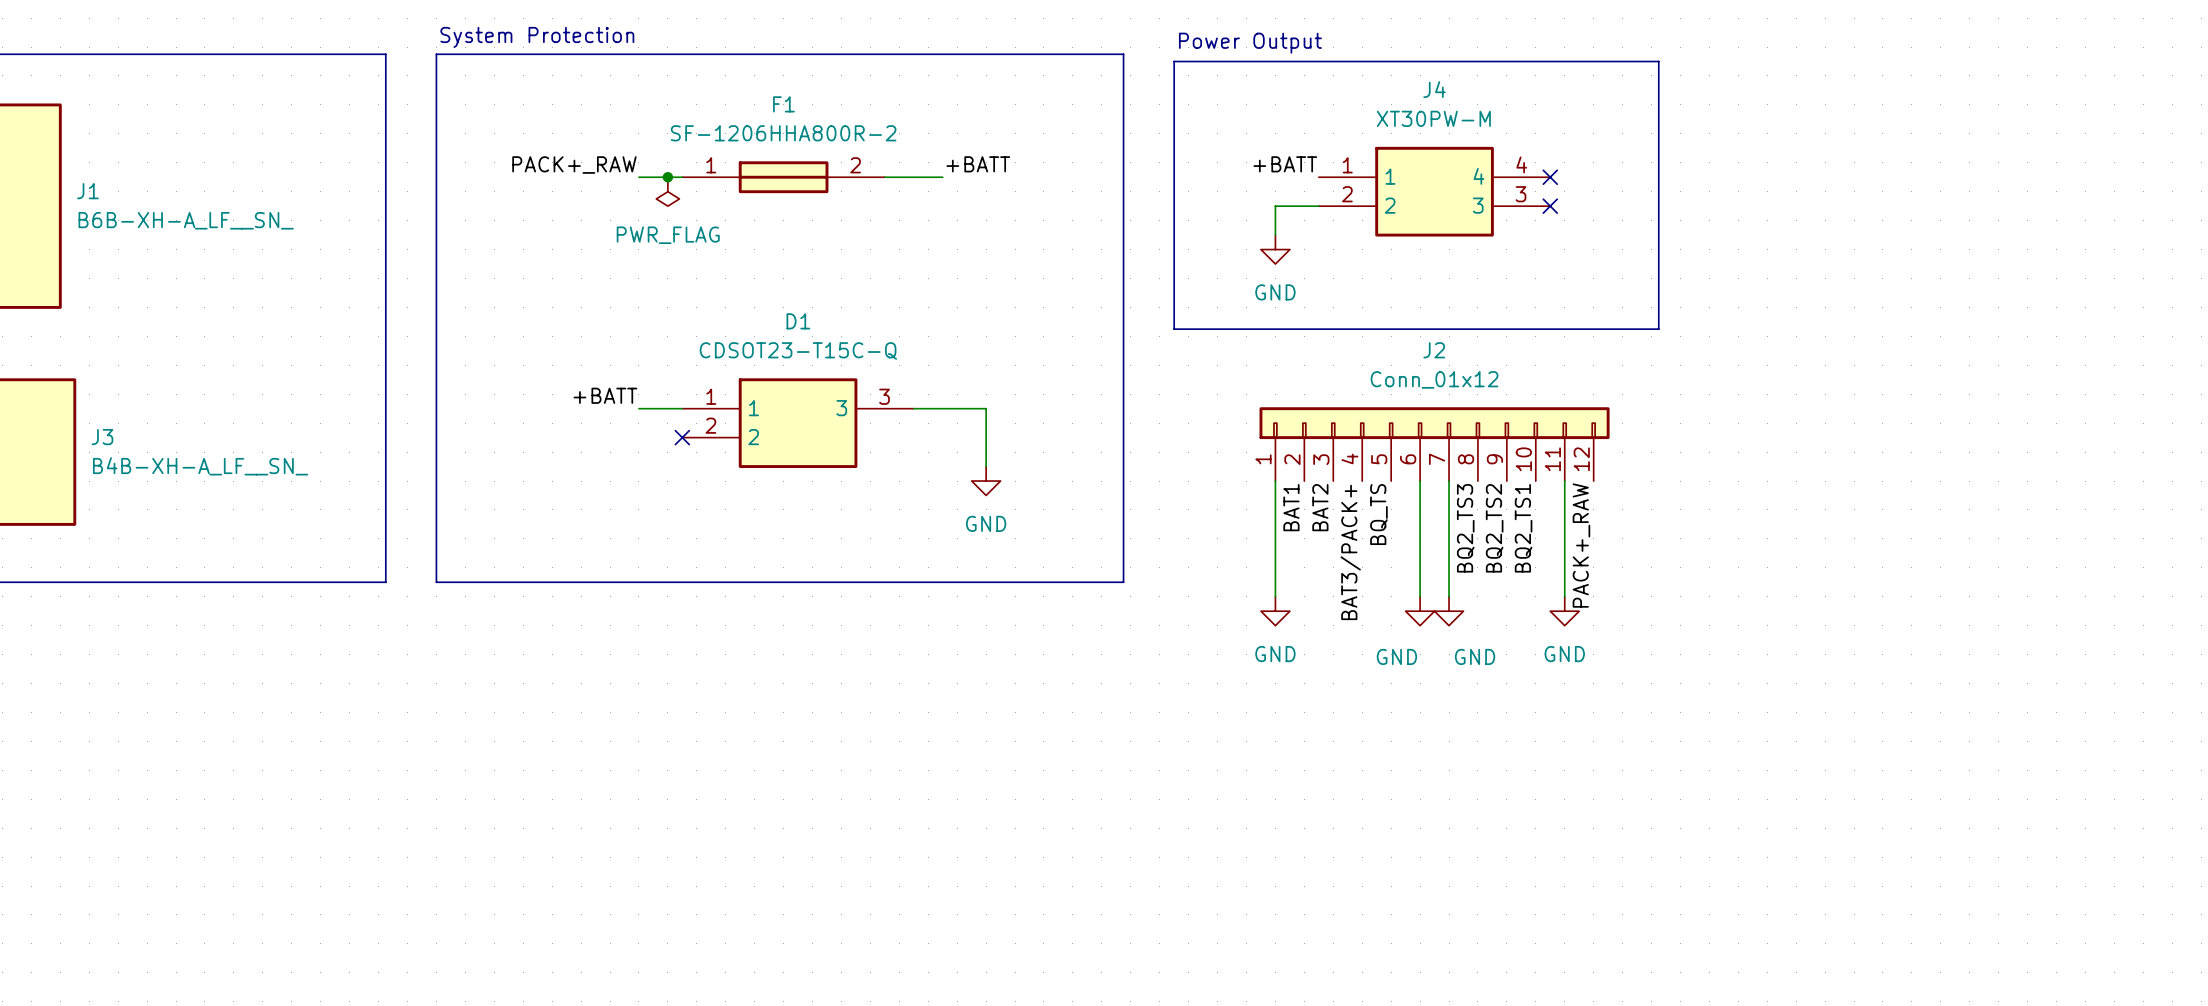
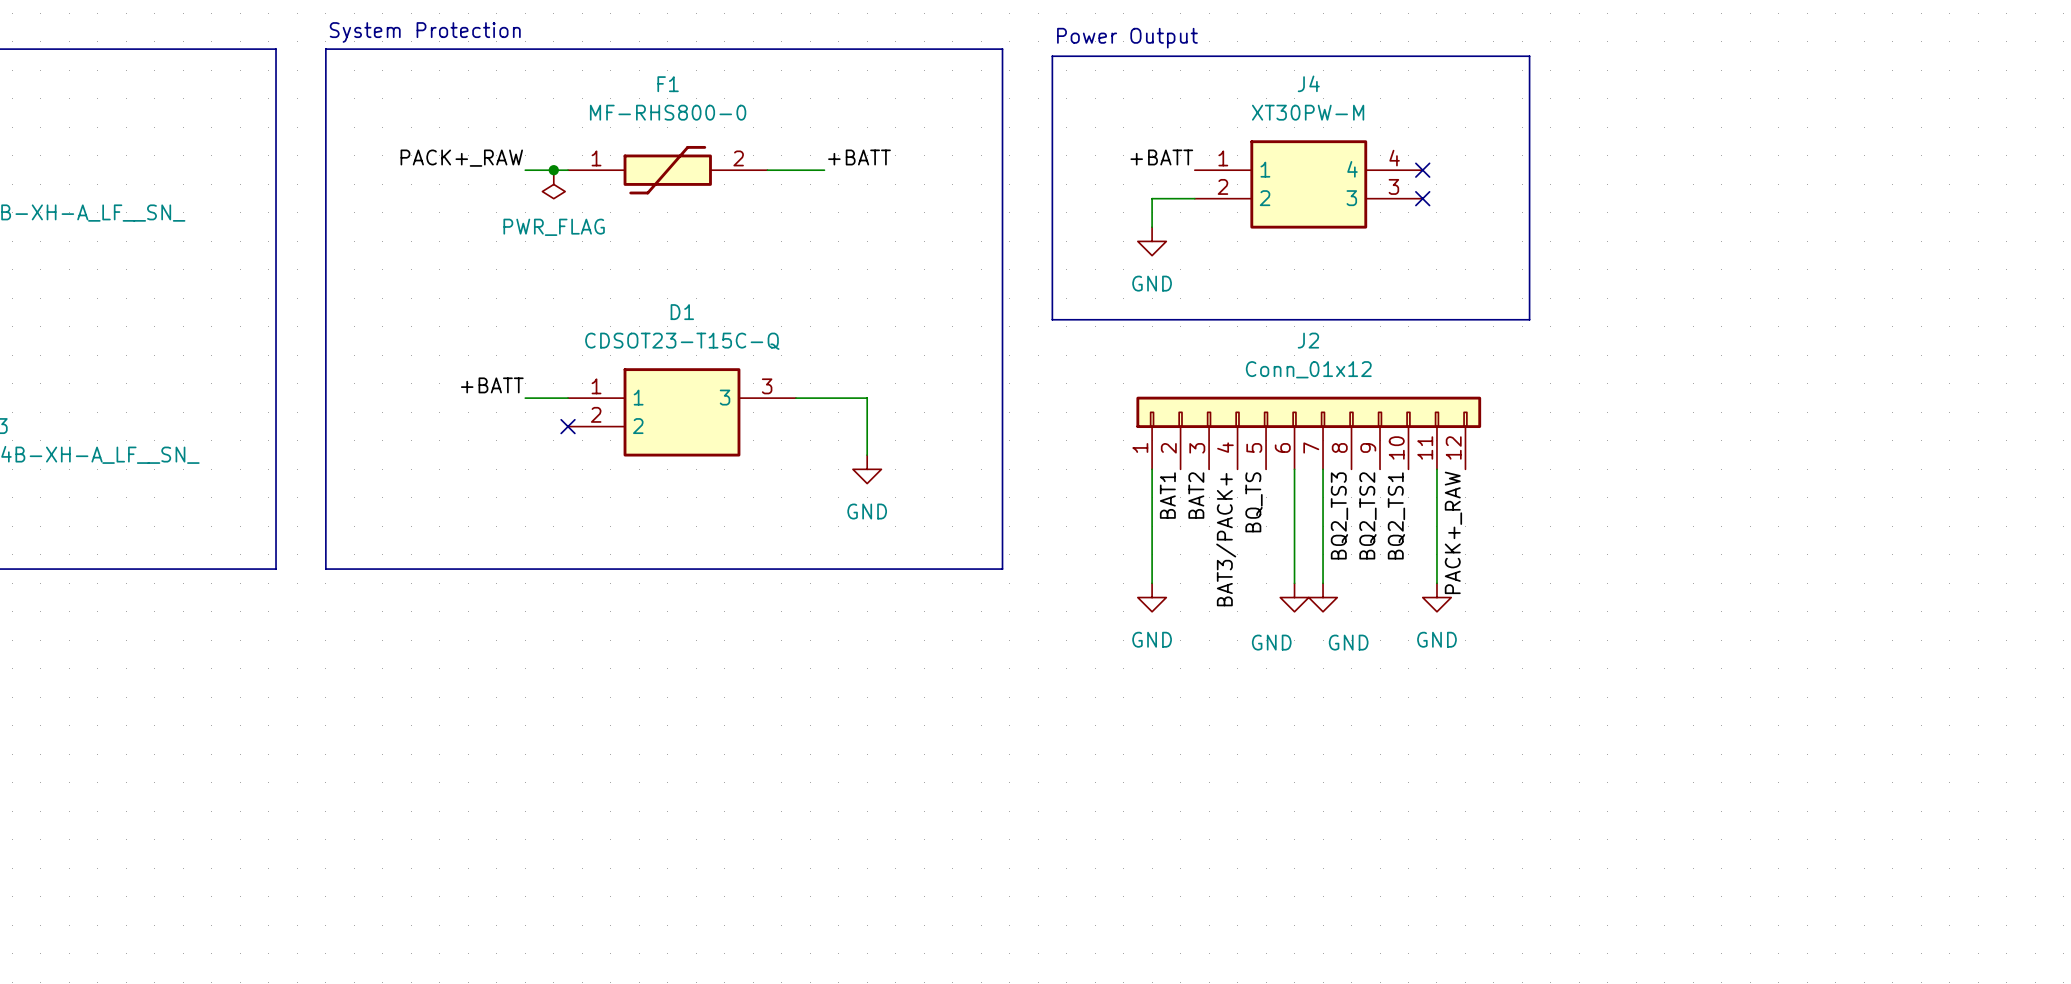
F1 value: SF-1206HHA800R-2 (783, 133) -> MF-RHS800-0 (668, 112)
F1 symbol: [682, 161, 885, 194] -> [568, 145, 768, 195]

